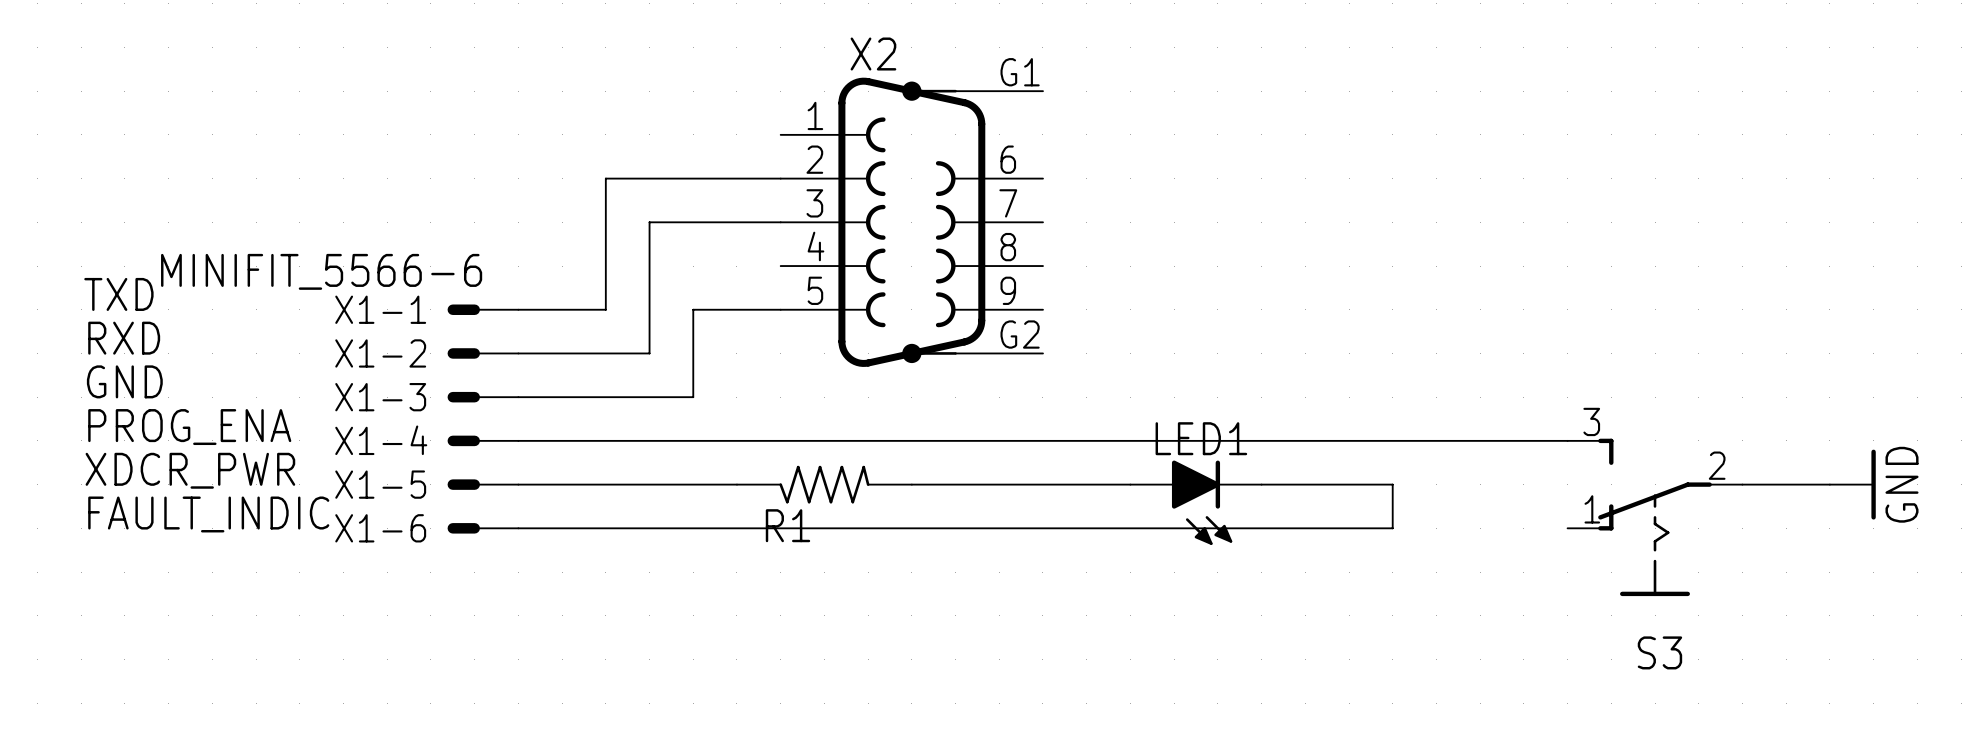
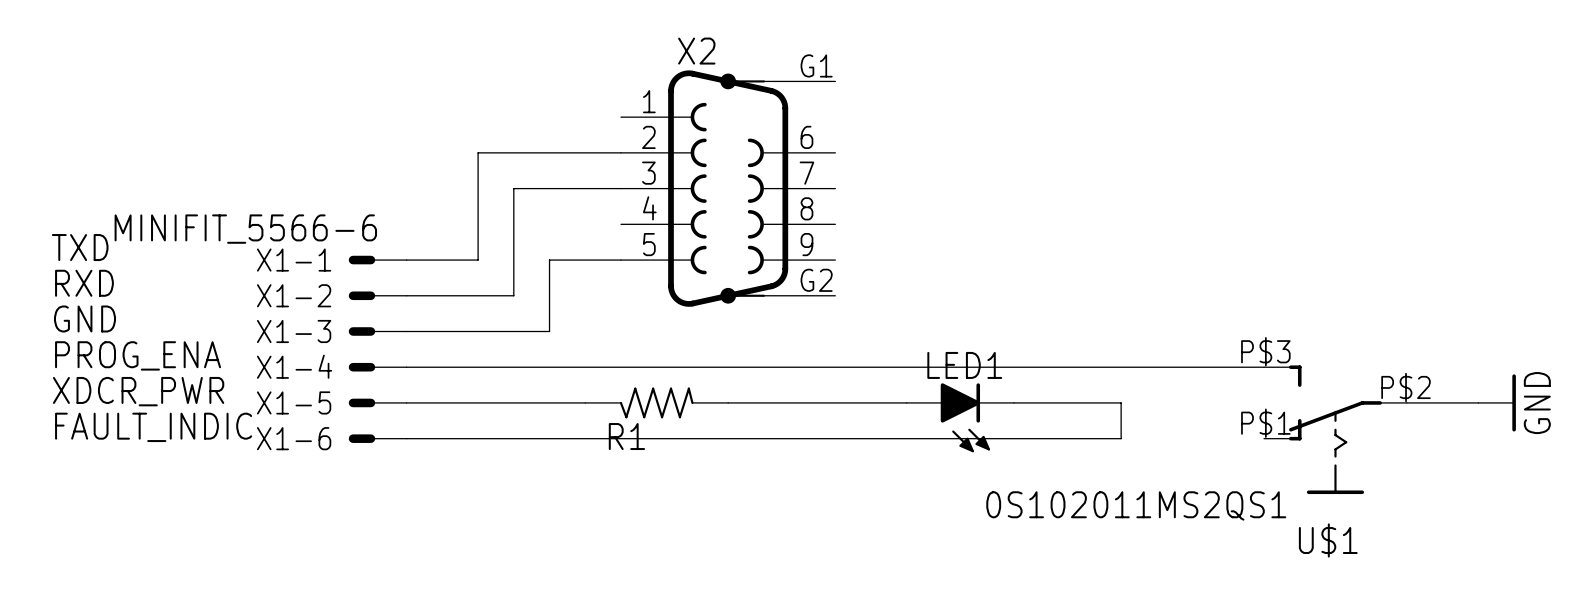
S3 pin number: 3 (1591, 421) -> P$3 (1265, 351)
S3 pin number: 2 (1717, 465) -> P$2 (1406, 387)
S3 pin number: 1 (1592, 509) -> P$1 (1265, 423)
S3 value: none -> 0S102011MS2QS1 (1136, 505)
S3 name: S3 (1659, 652) -> U$1 (1328, 540)

